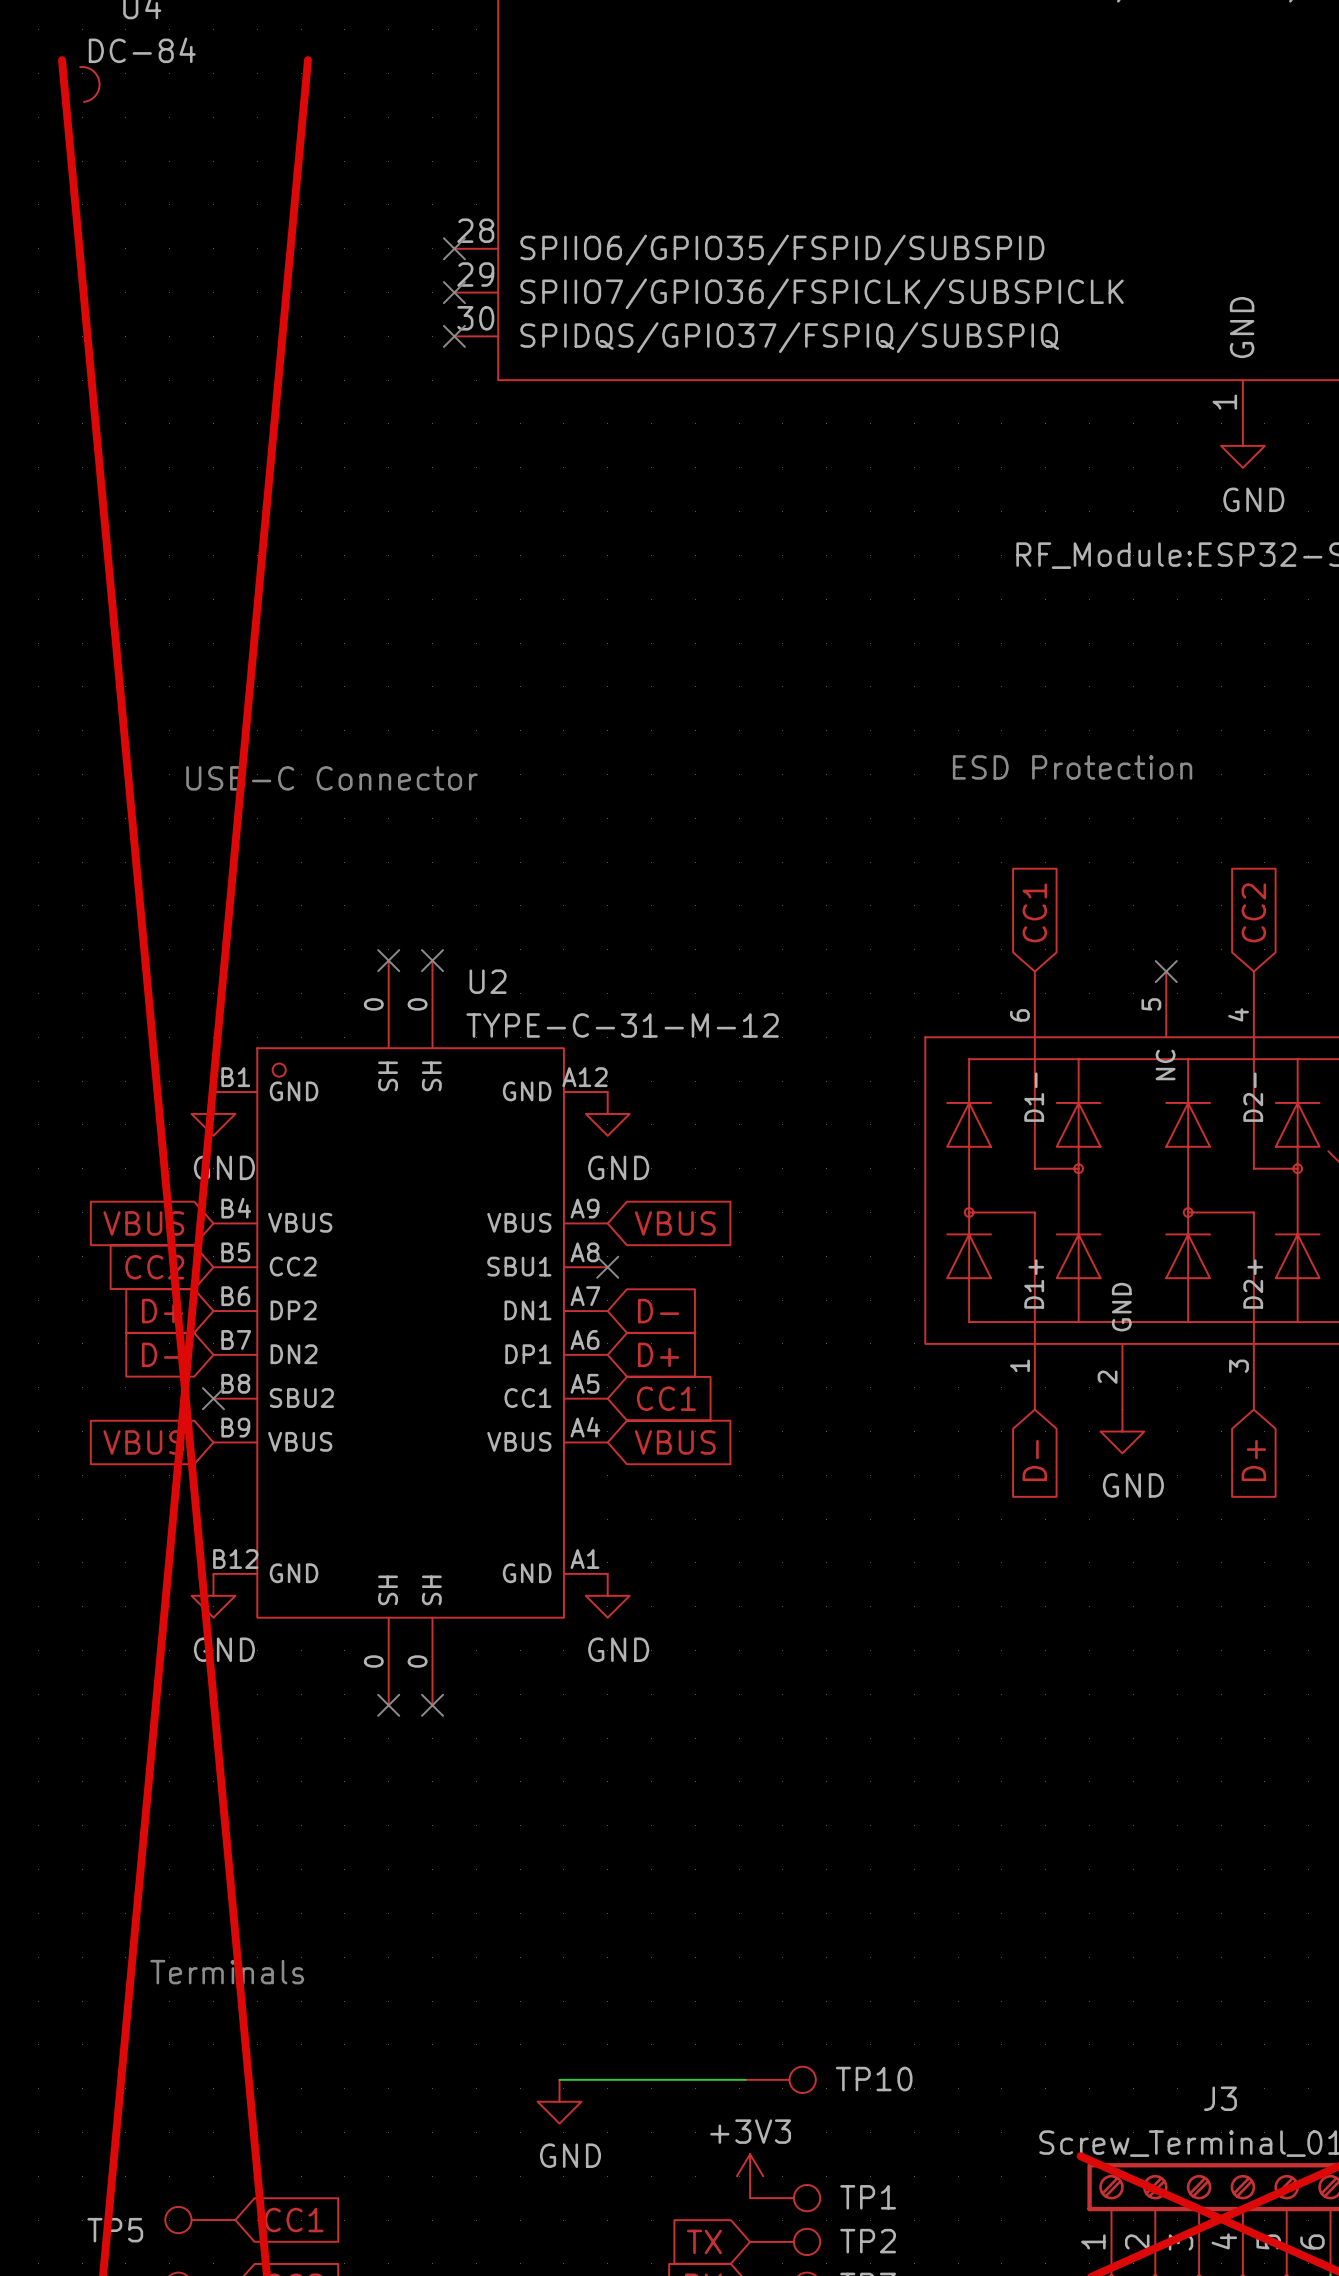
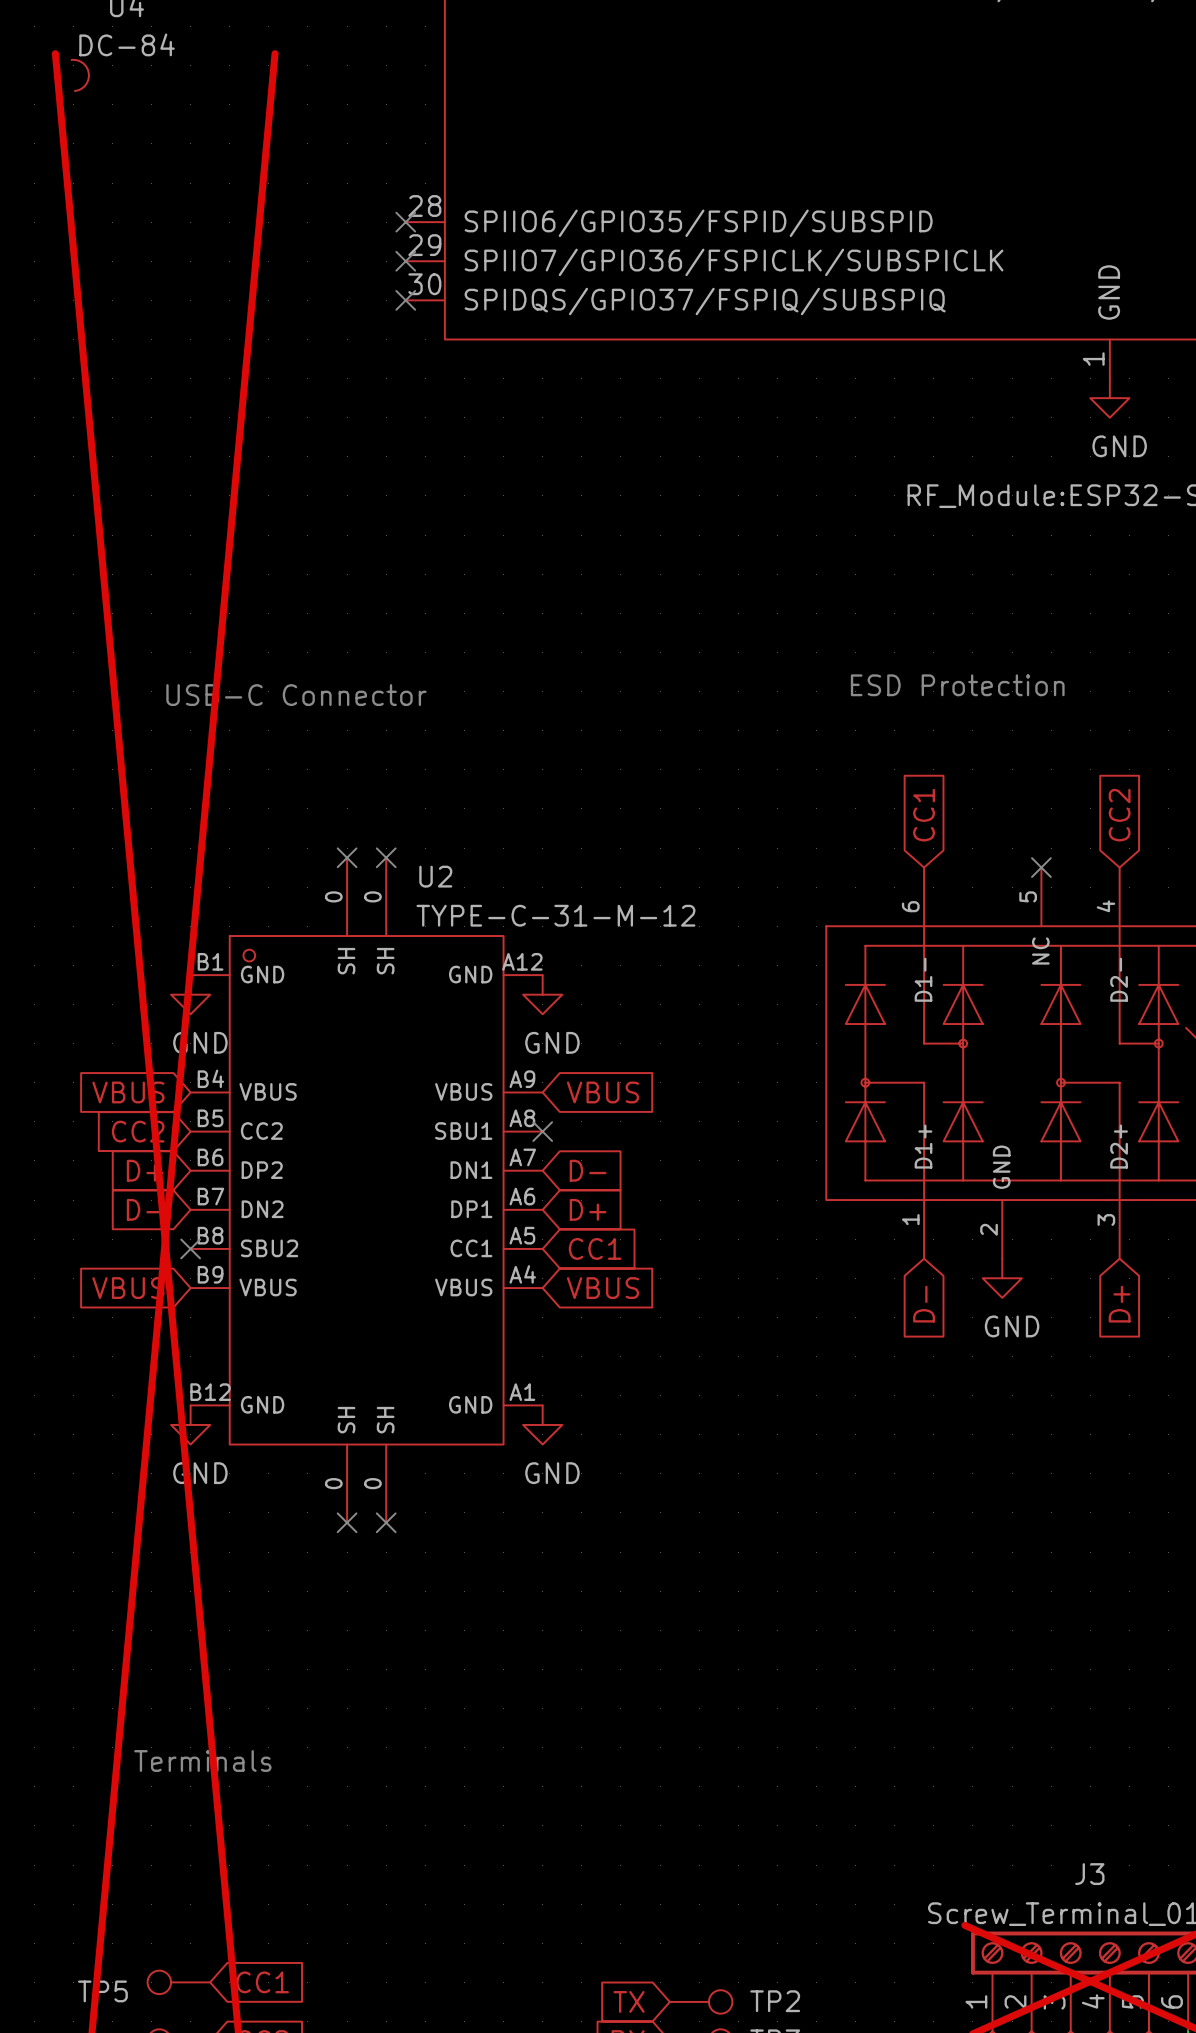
wire: (559, 2079) (745, 2079) -> none
TP10: (780, 2079) -> none
power symbol: GND (559, 2101) -> none
power symbol: +3V3 (750, 2176) -> none
TP1: (785, 2198) -> none

